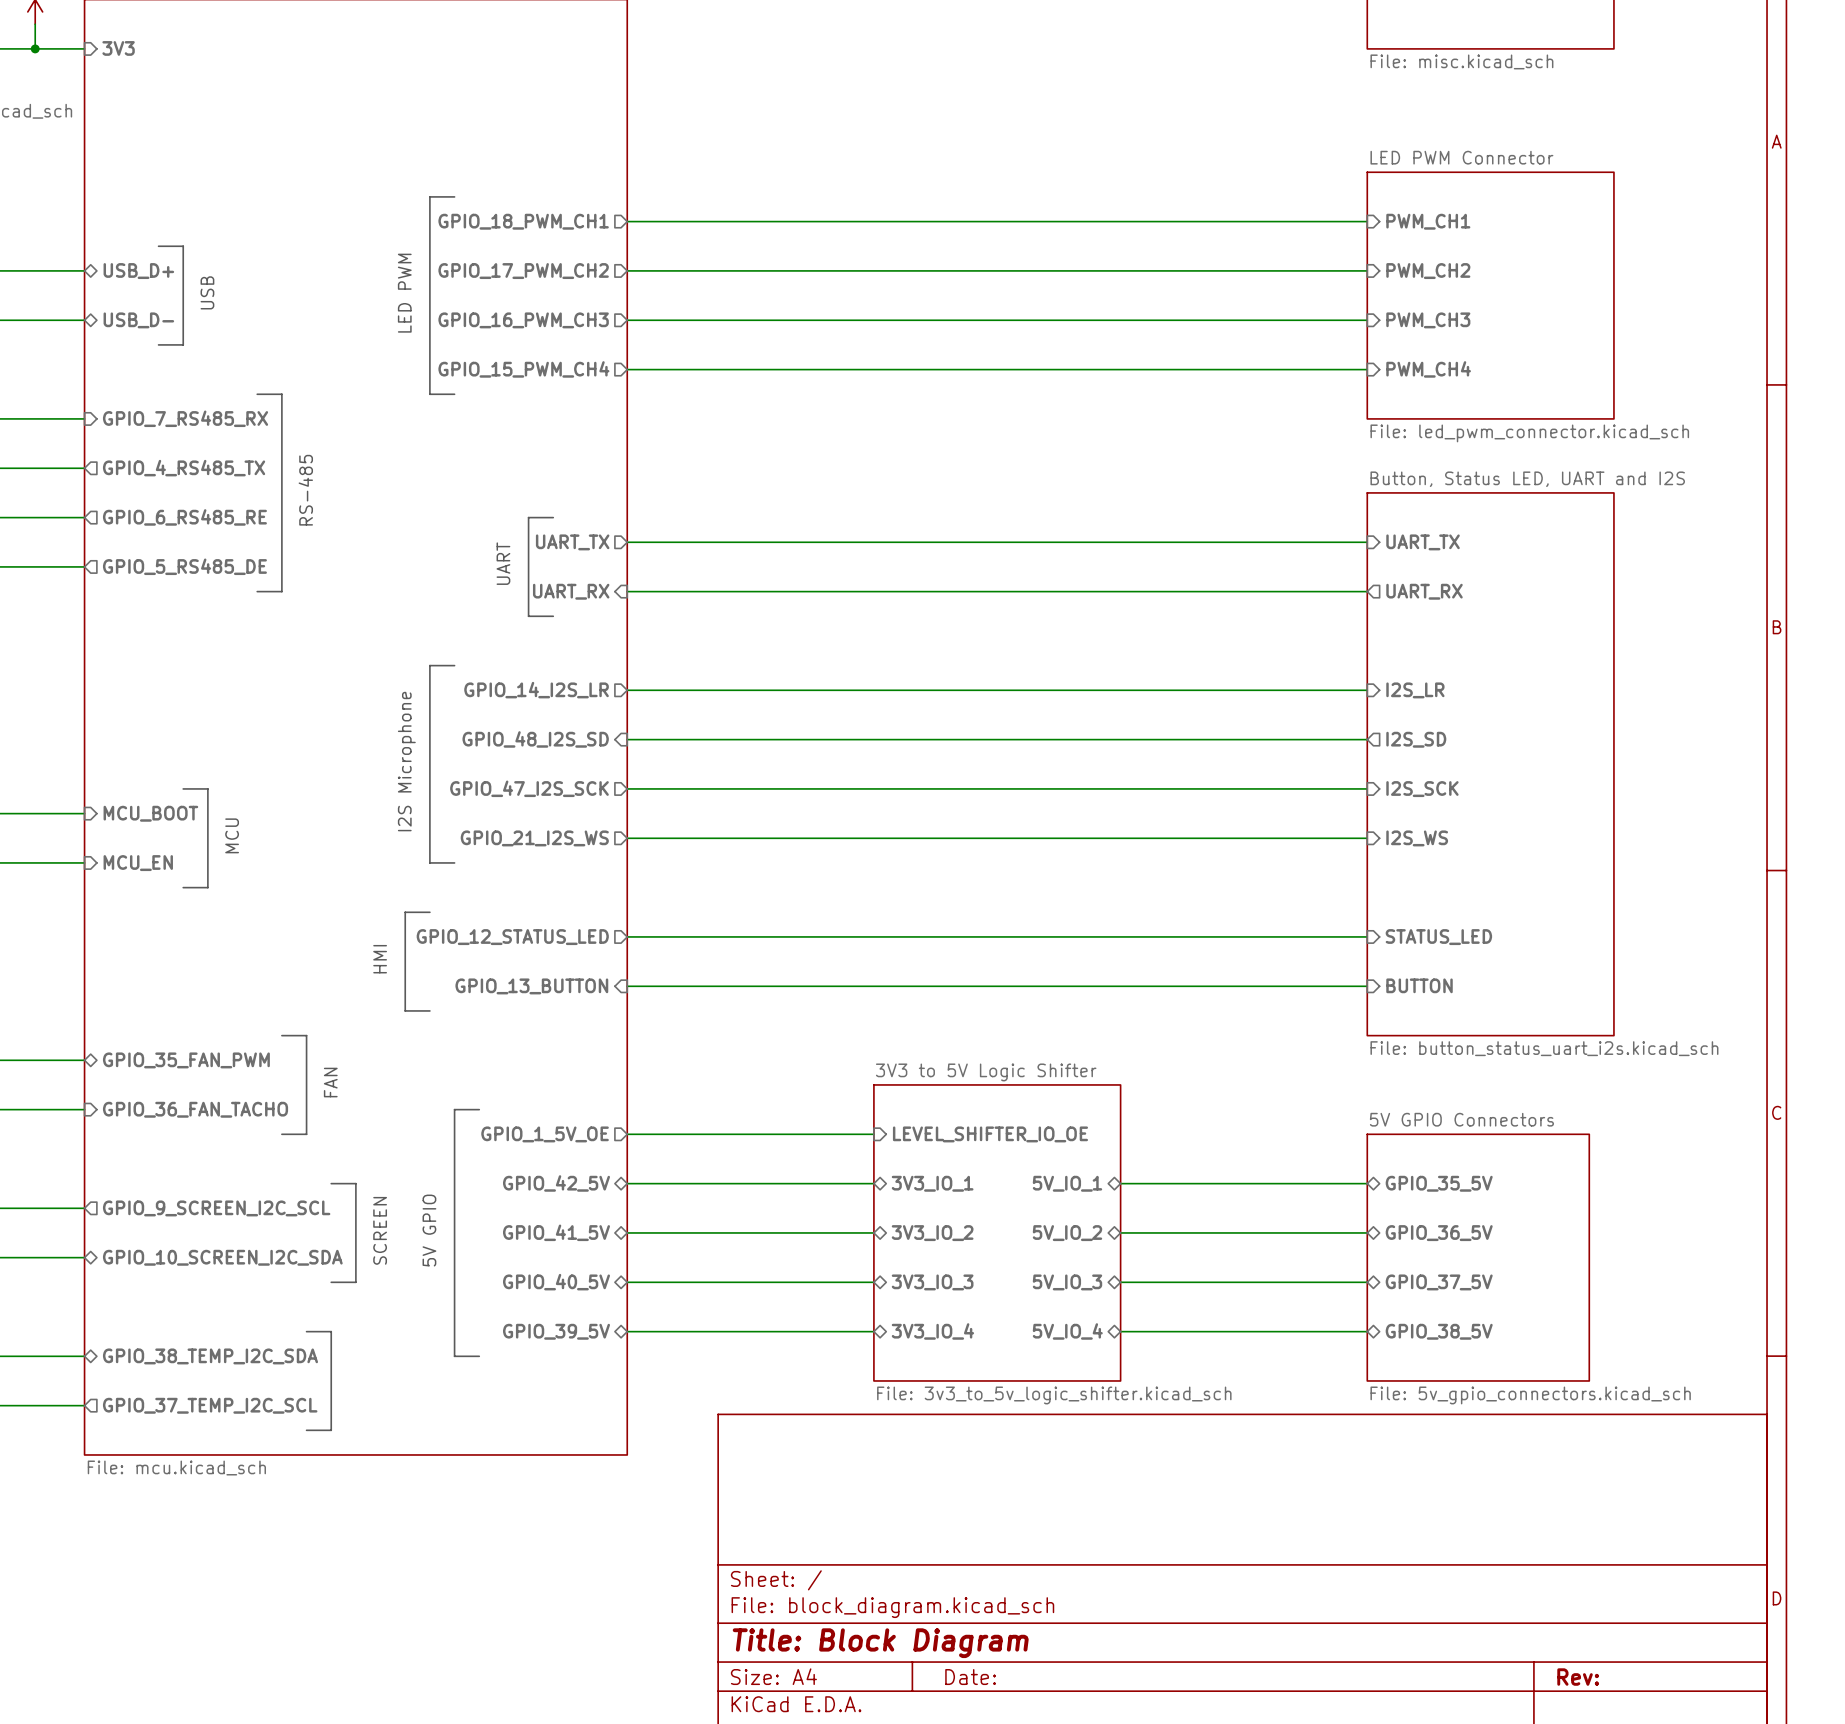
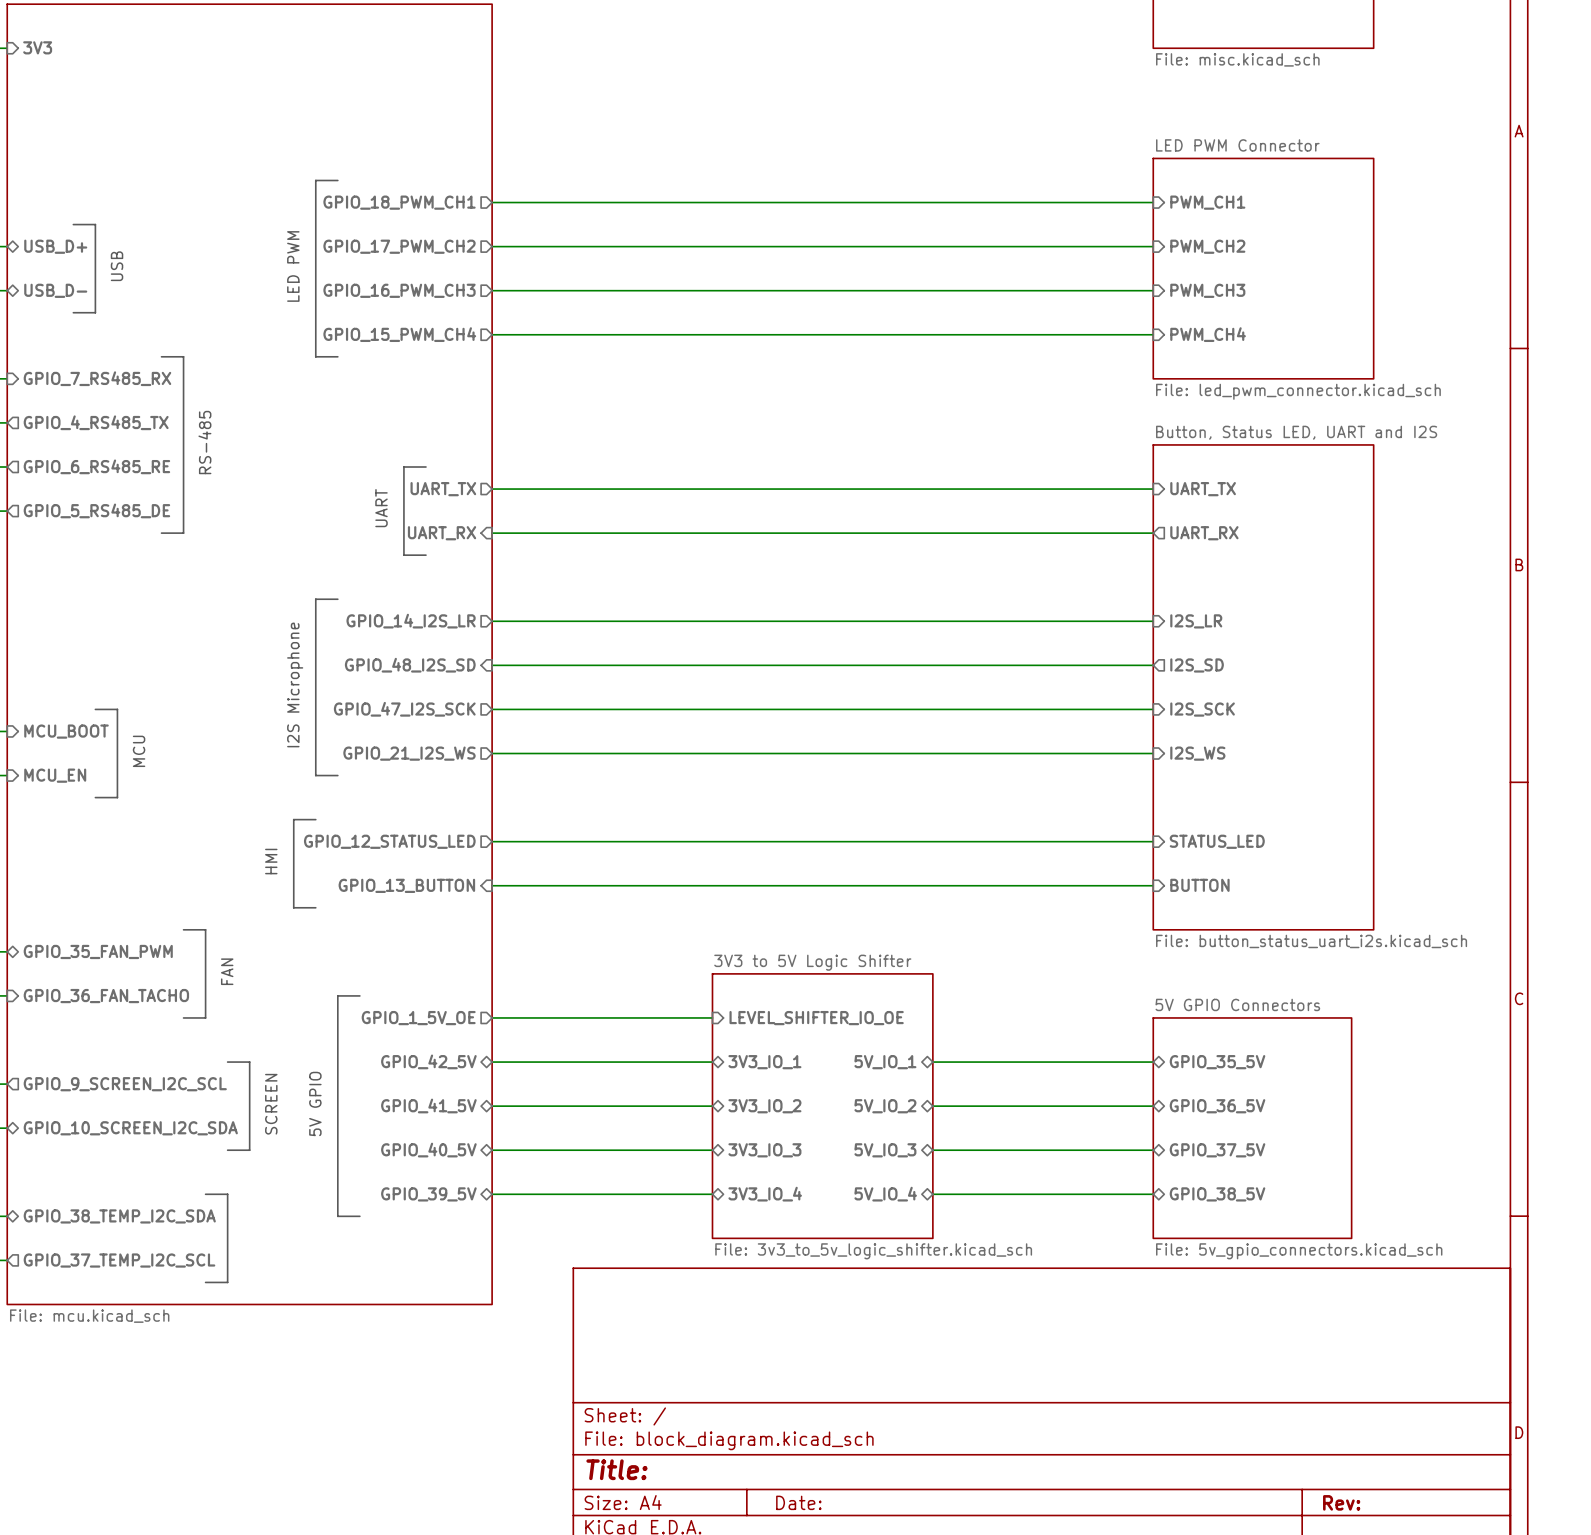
title block: Title: Block Diagram (880, 1643) -> Title: (616, 1469)

